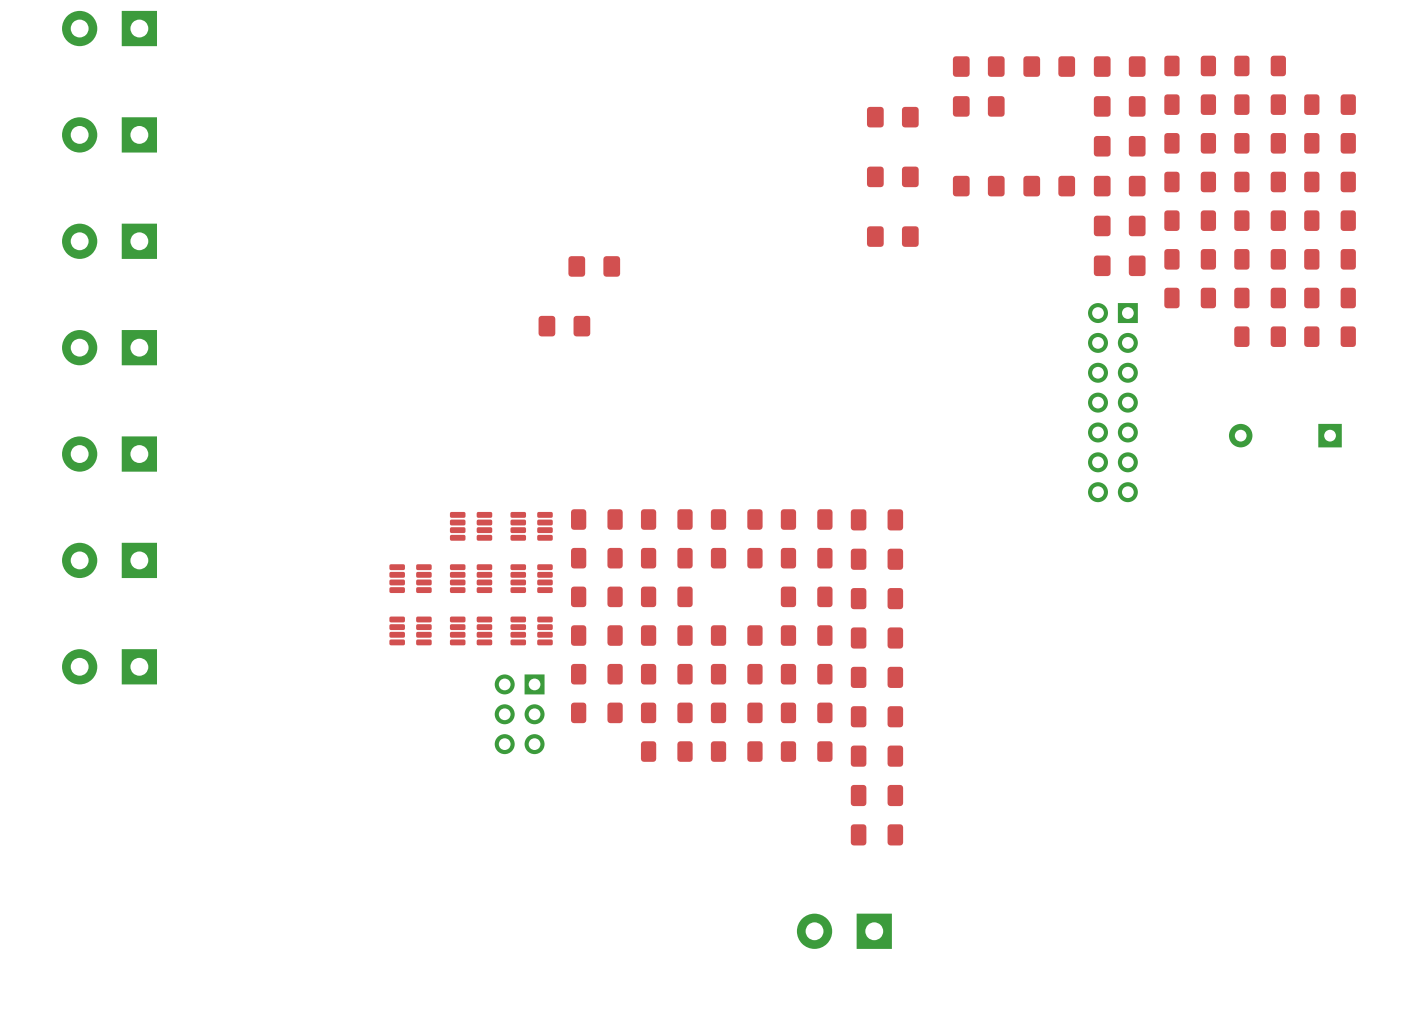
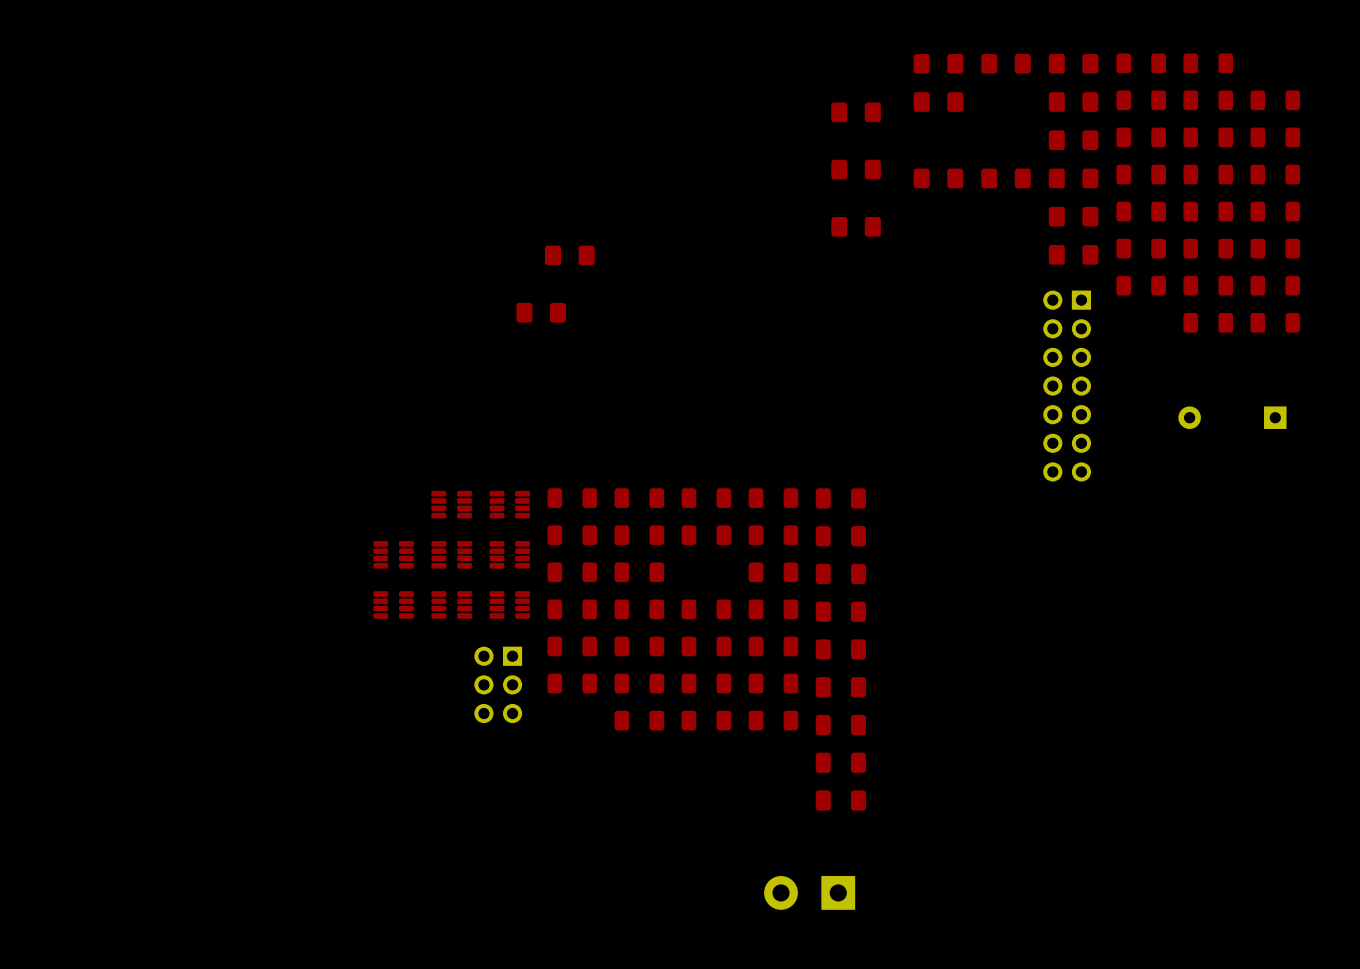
part: (109, 28) -> none
part: (109, 134) -> none
part: (109, 241) -> none
part: (109, 347) -> none
part: (109, 454) -> none
part: (109, 560) -> none
part: (109, 666) -> none

